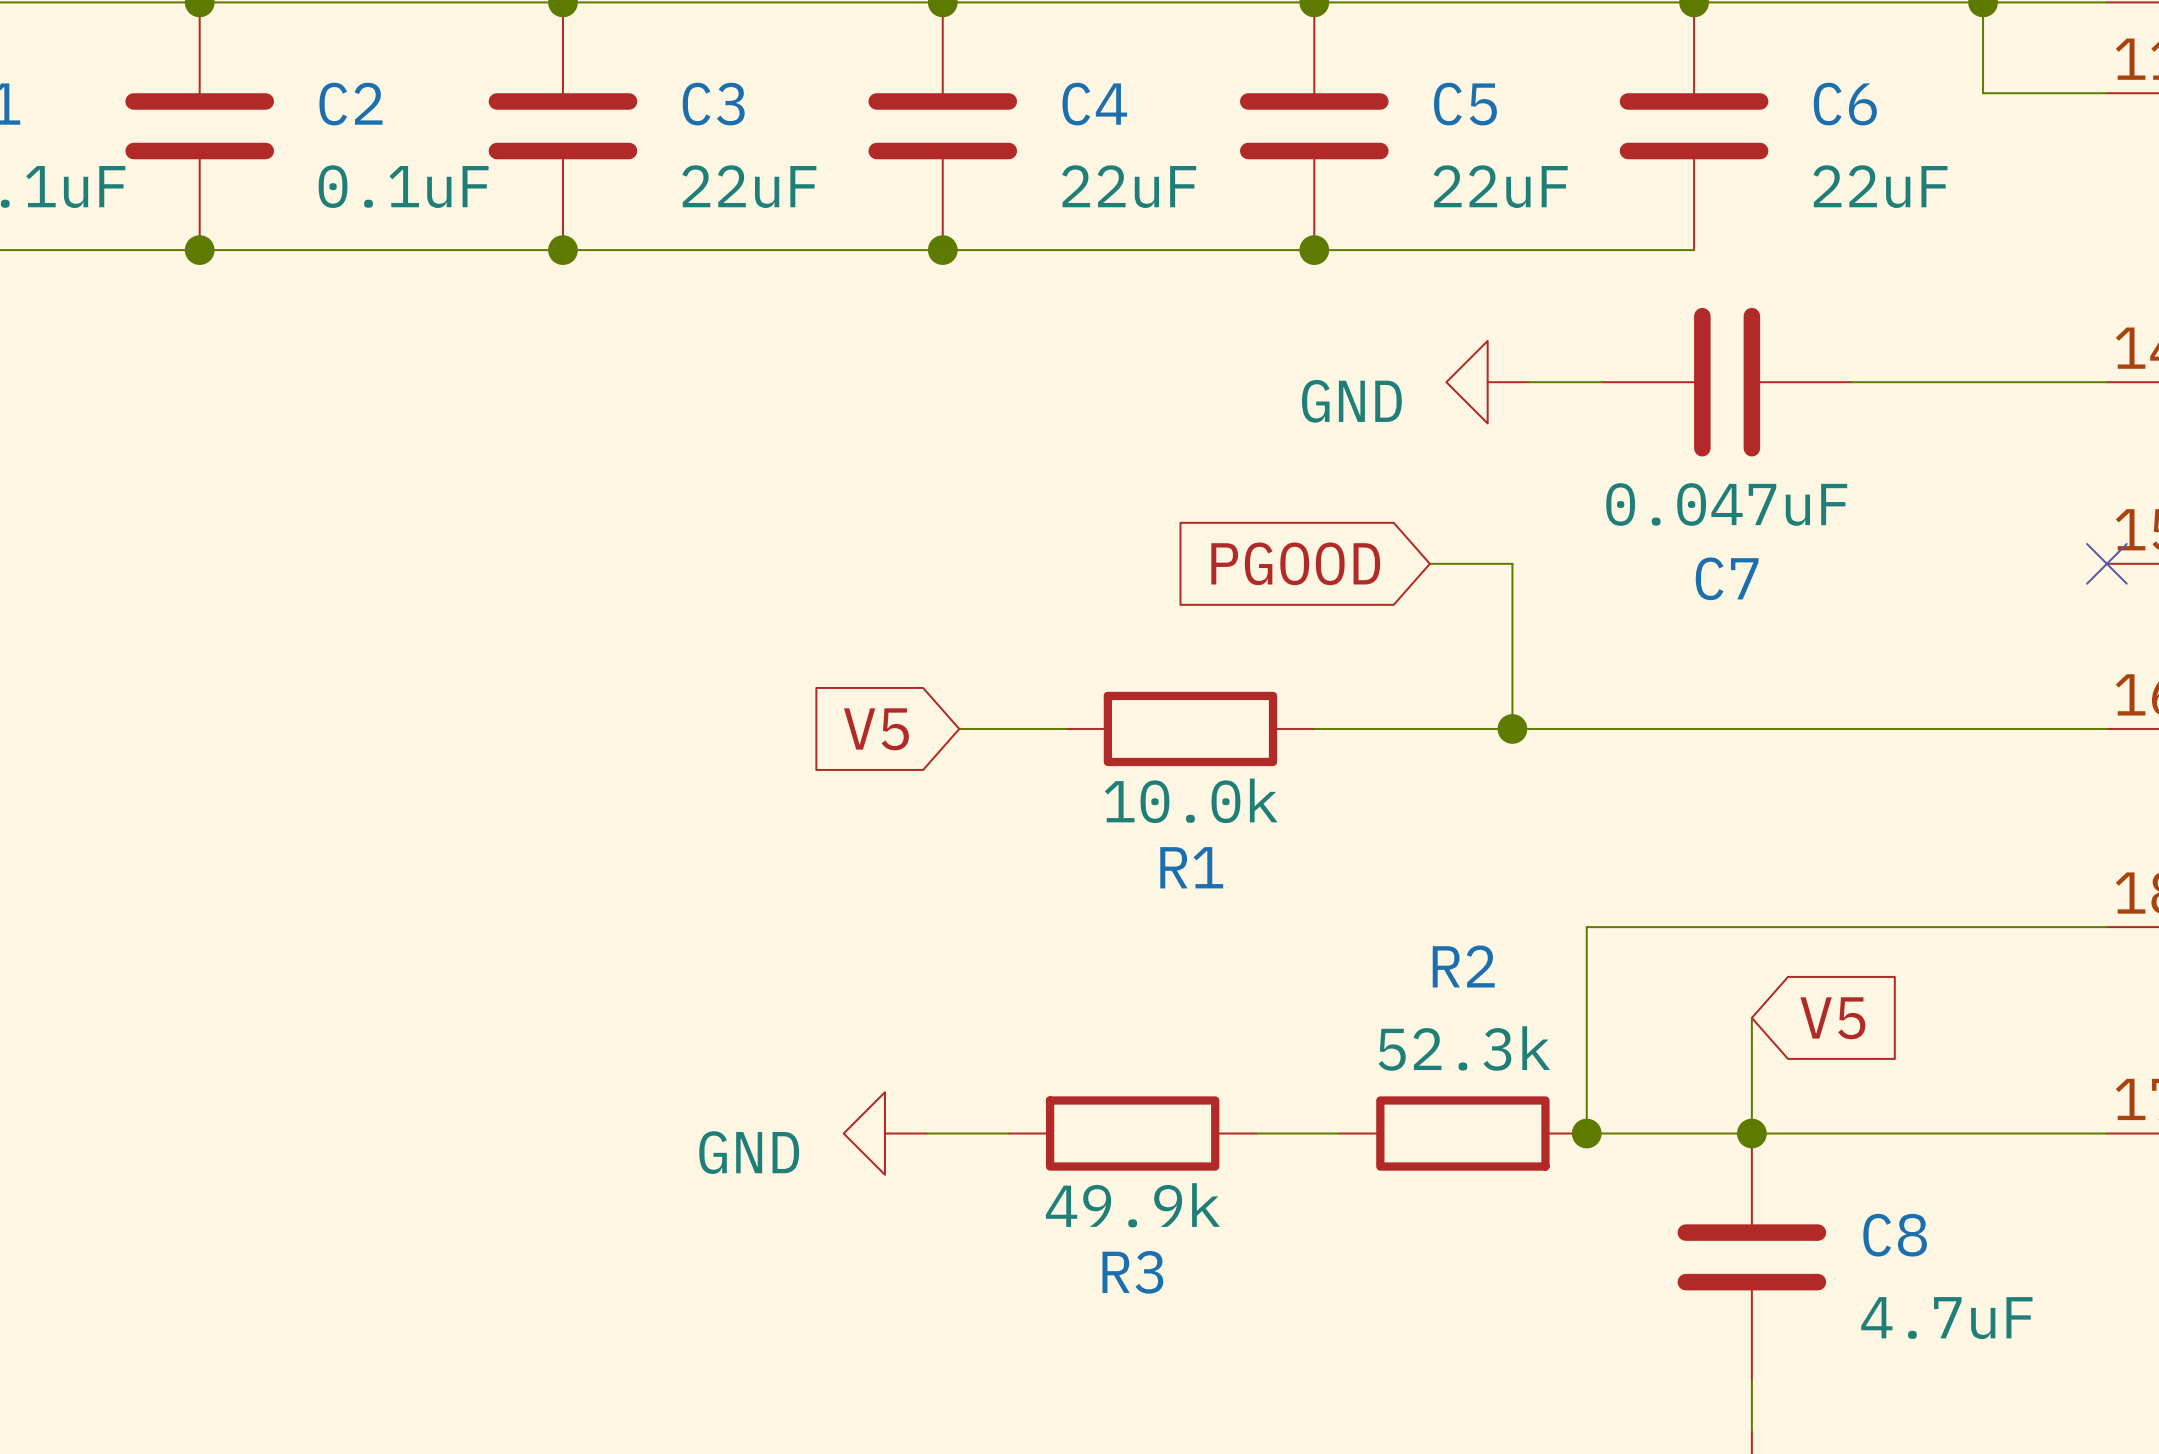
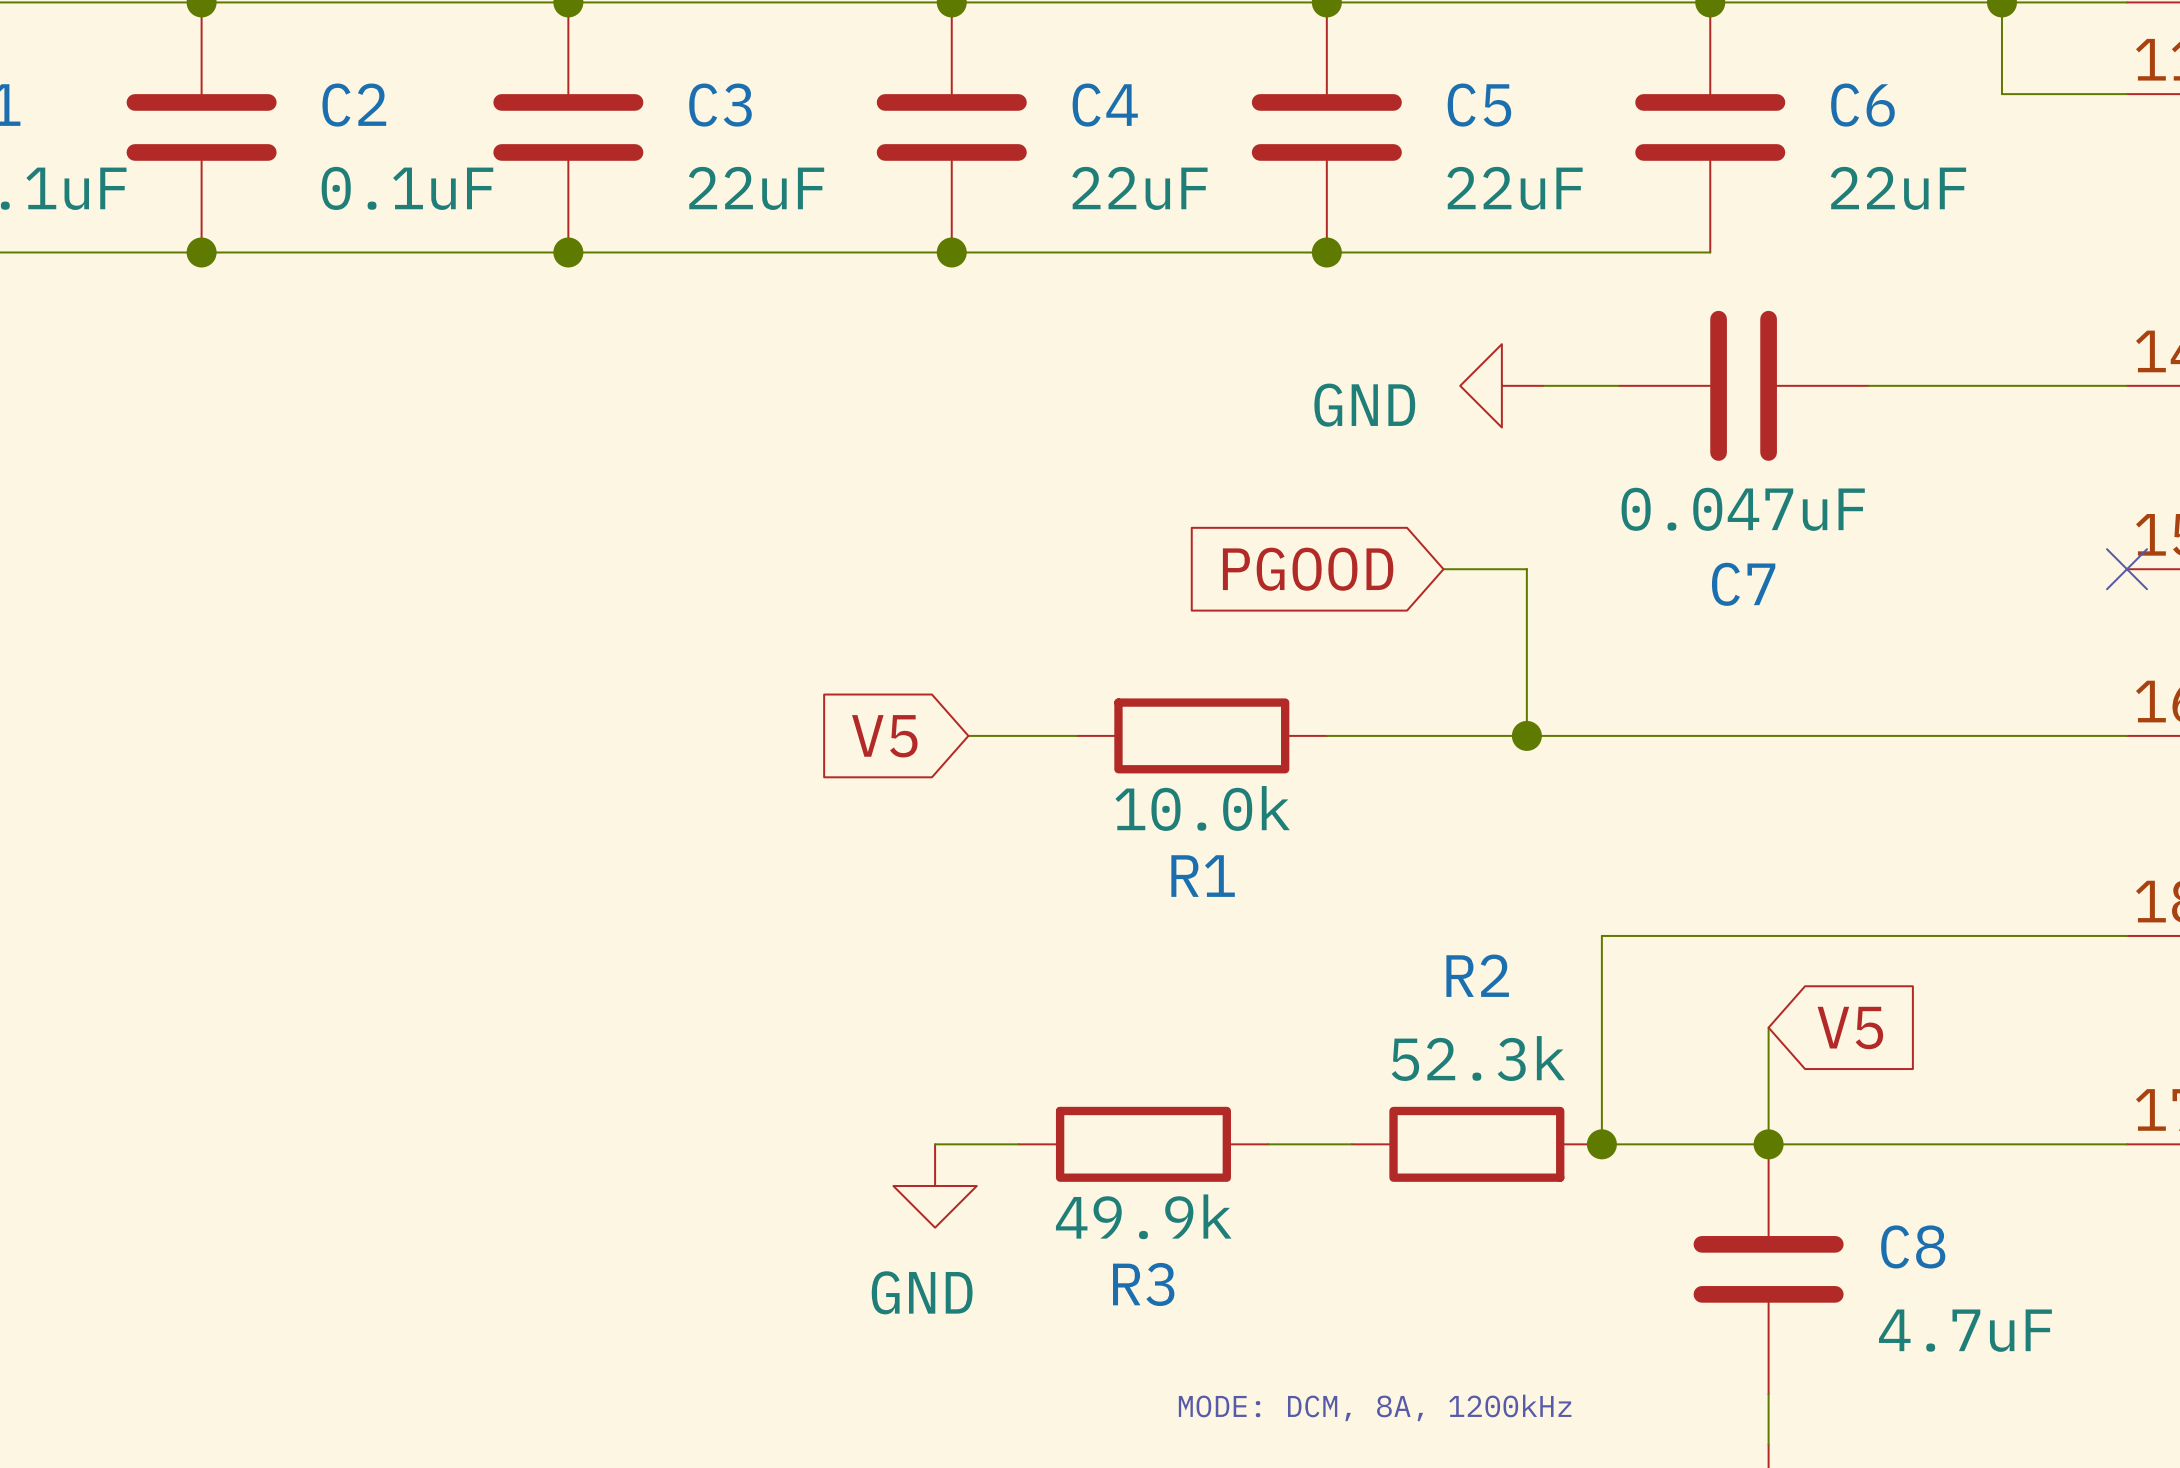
power symbol rotation: 0° (884, 1133) -> 90° counterclockwise (935, 1186)
power symbol position: GND (884, 1133) -> GND (935, 1186)
text: none -> MODE: DCM, 8A, 1200kHz (1375, 1407)

